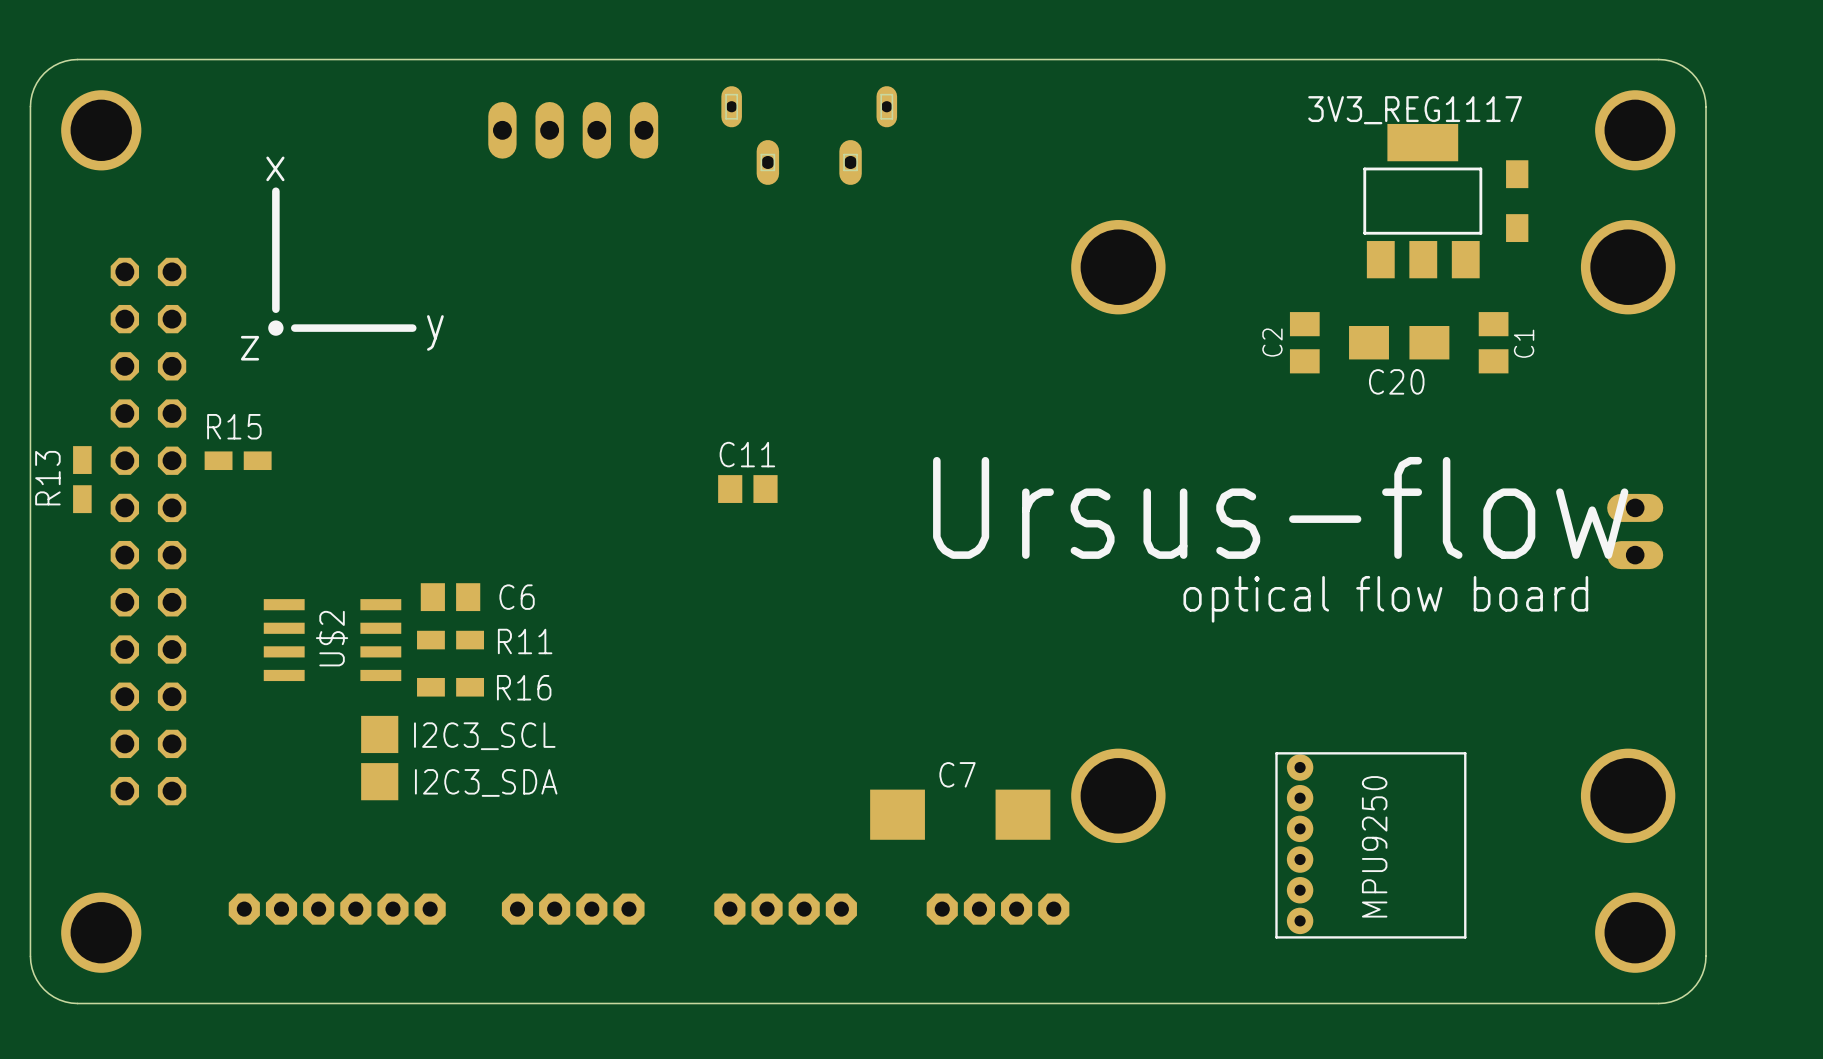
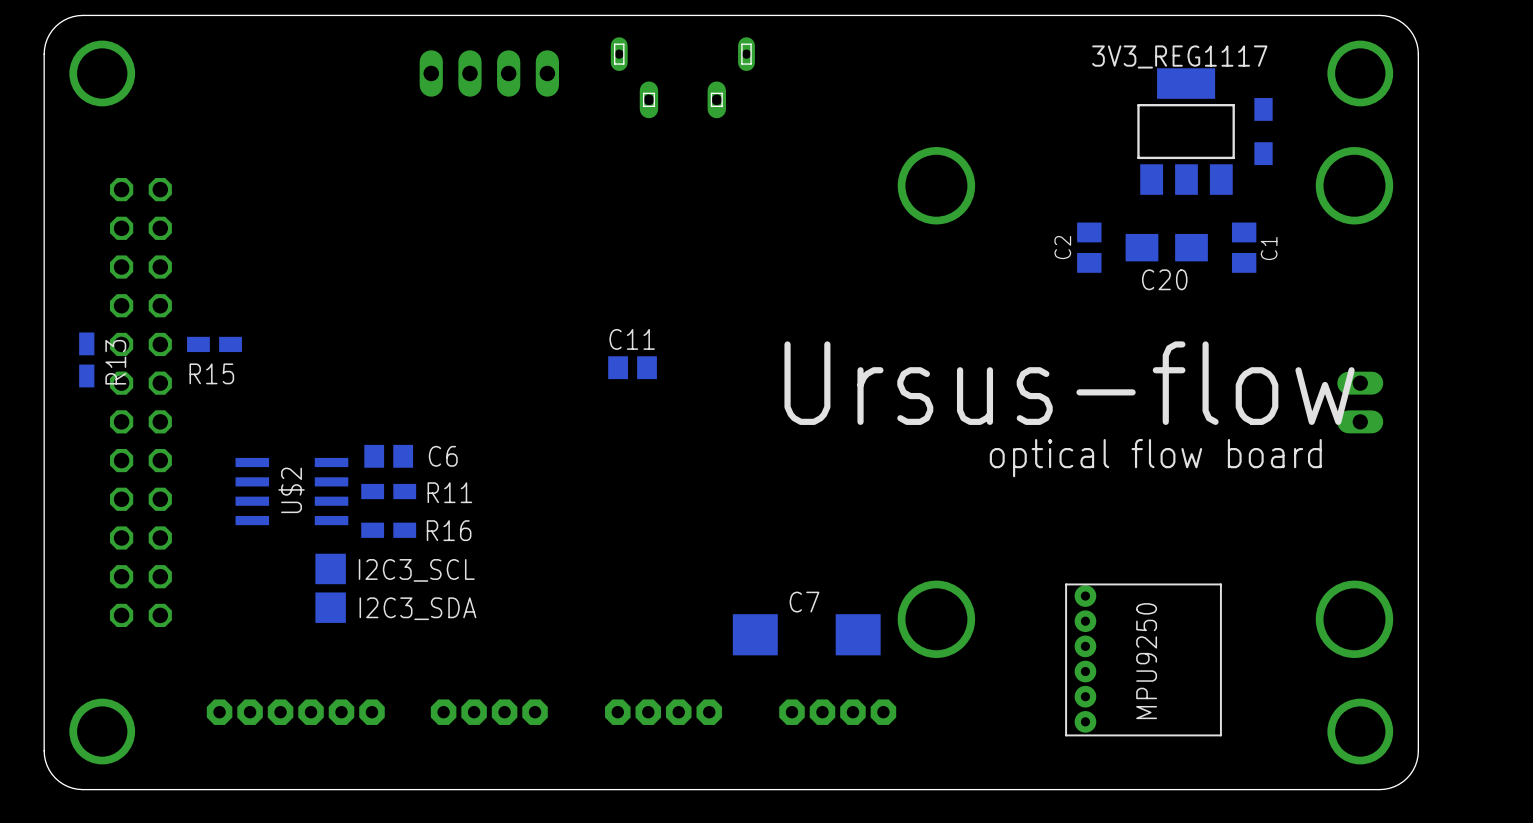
text: x (275, 168) -> none
line: (275, 191) (275, 309) -> none
drawing: [268, 320, 284, 336] -> none
line: (412, 328) (294, 328) -> none
text: y (435, 332) -> none
text: z (250, 348) -> none
R15 name position: R15 (234, 426) -> R15 (211, 373)
R13 name position: R13 (47, 478) -> R13 (115, 362)

